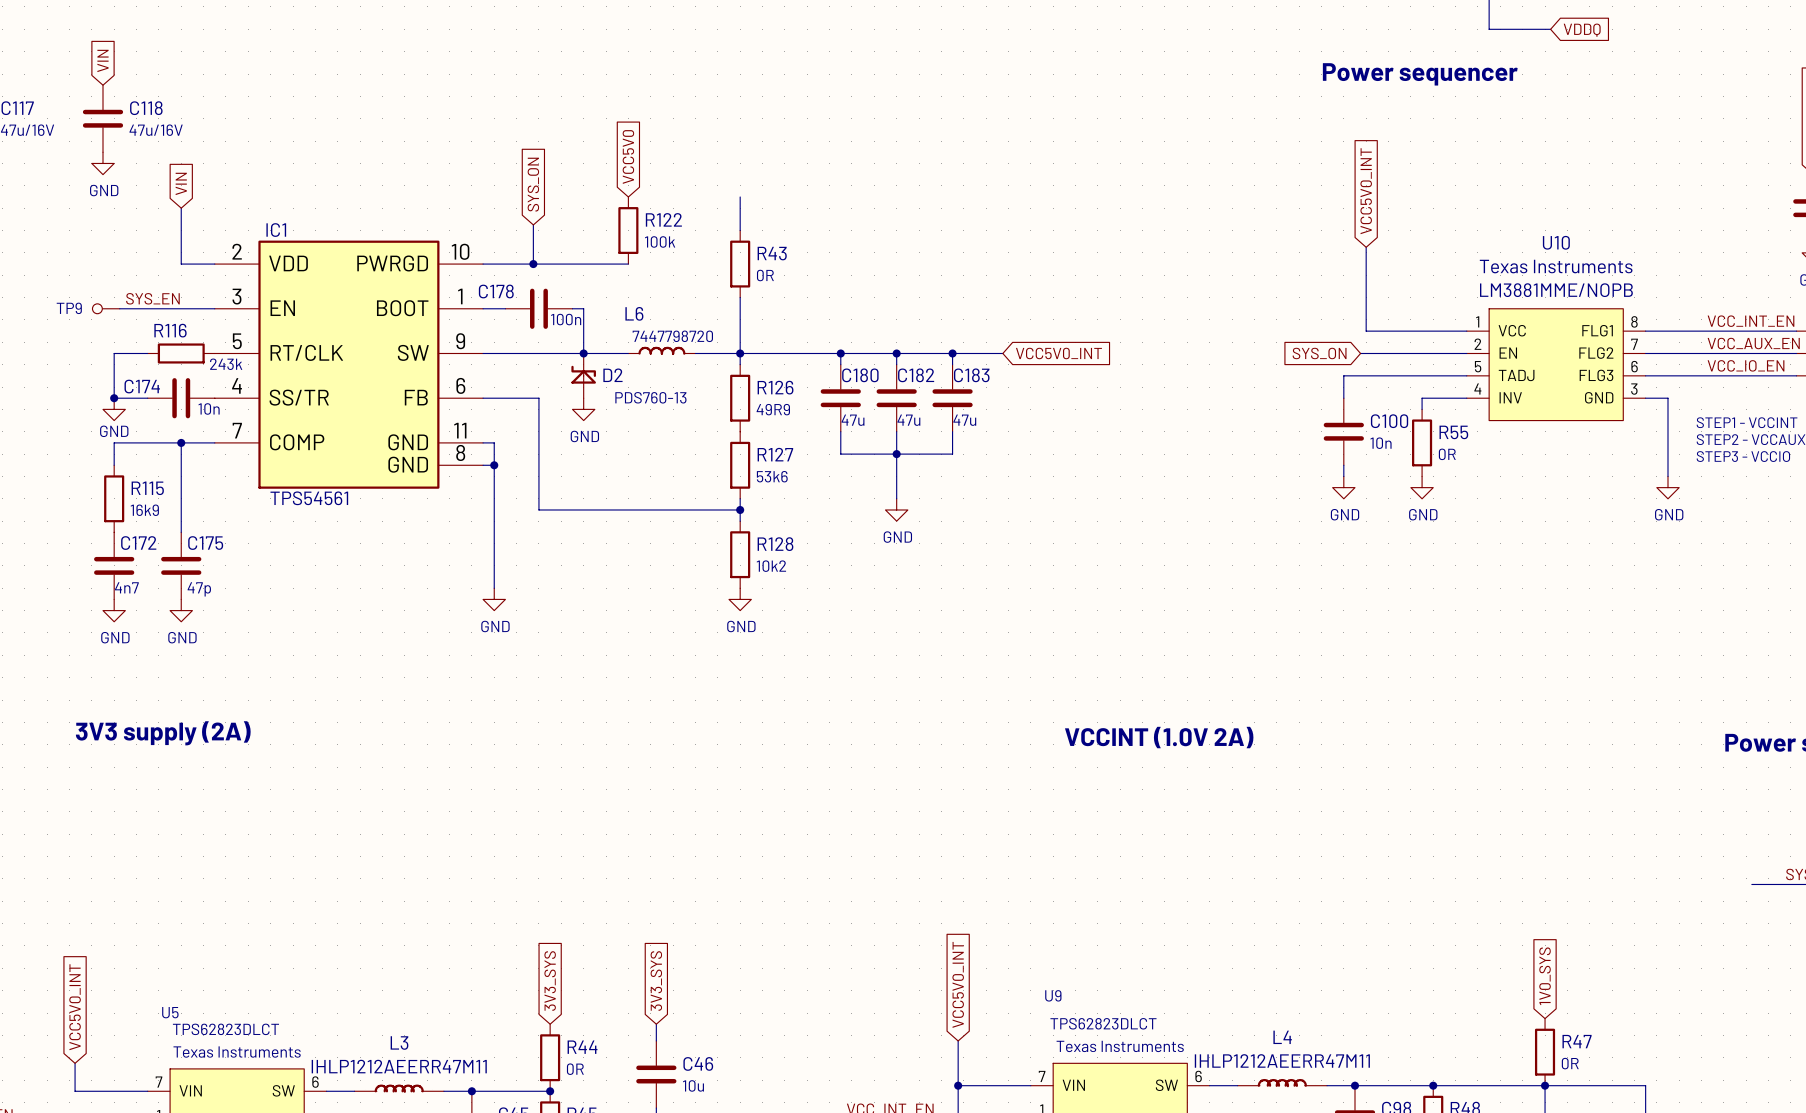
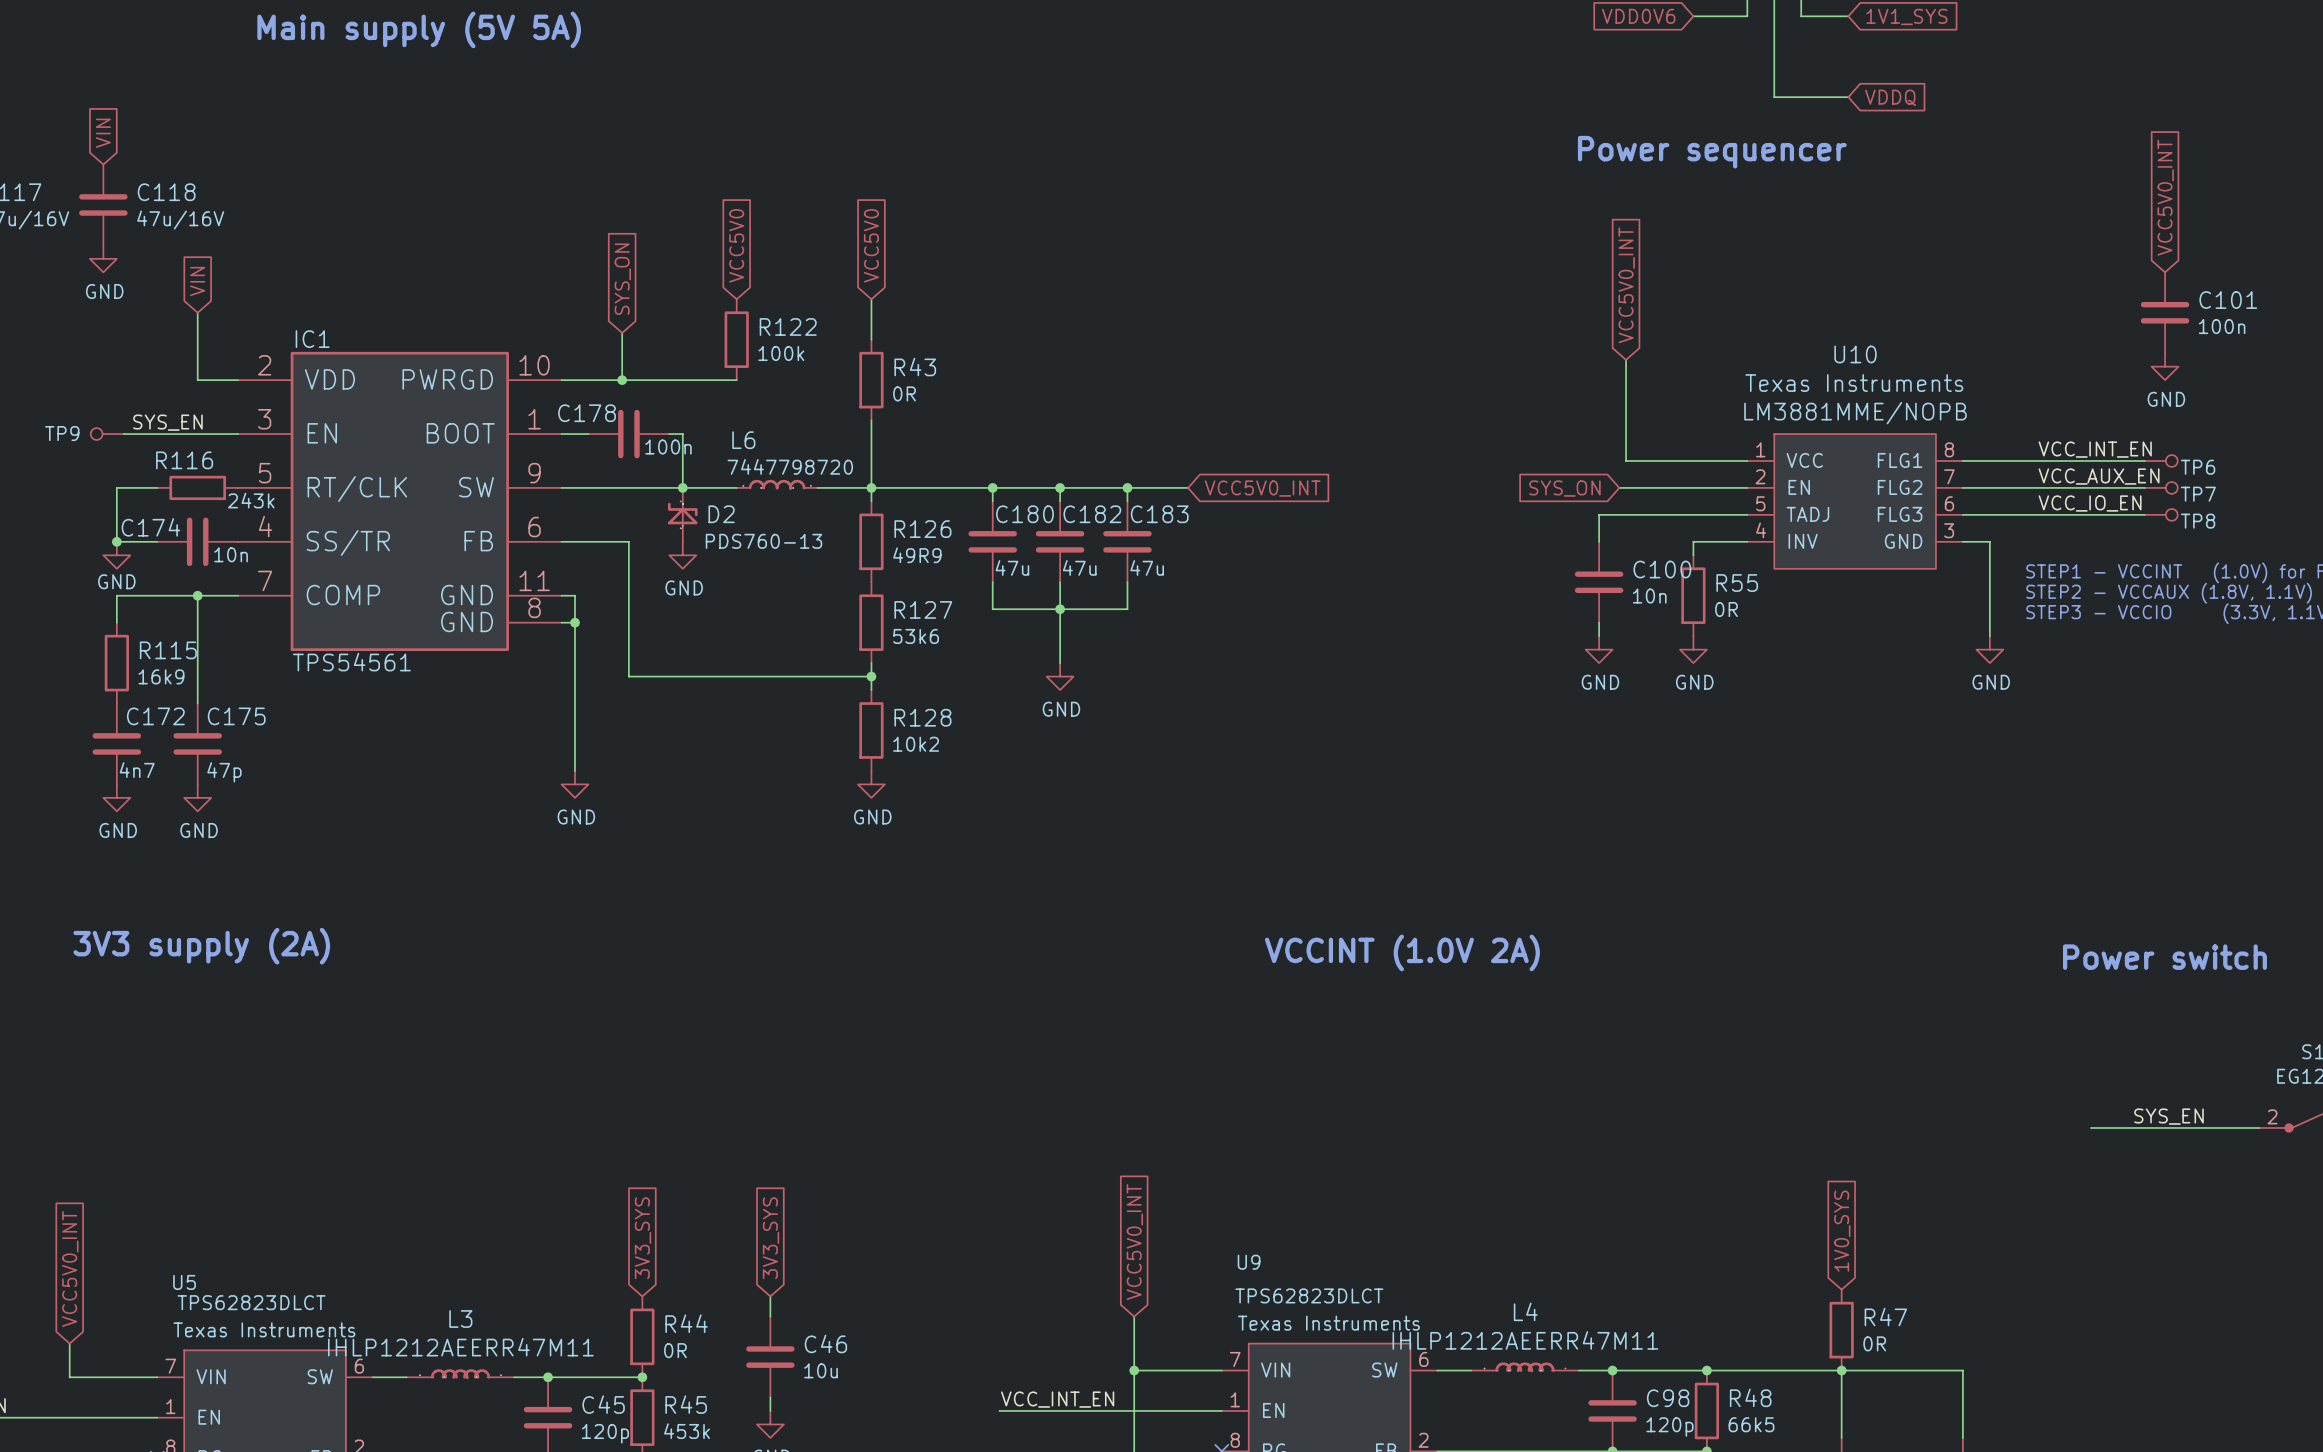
global label: none -> VCC5V0 (871, 245)

